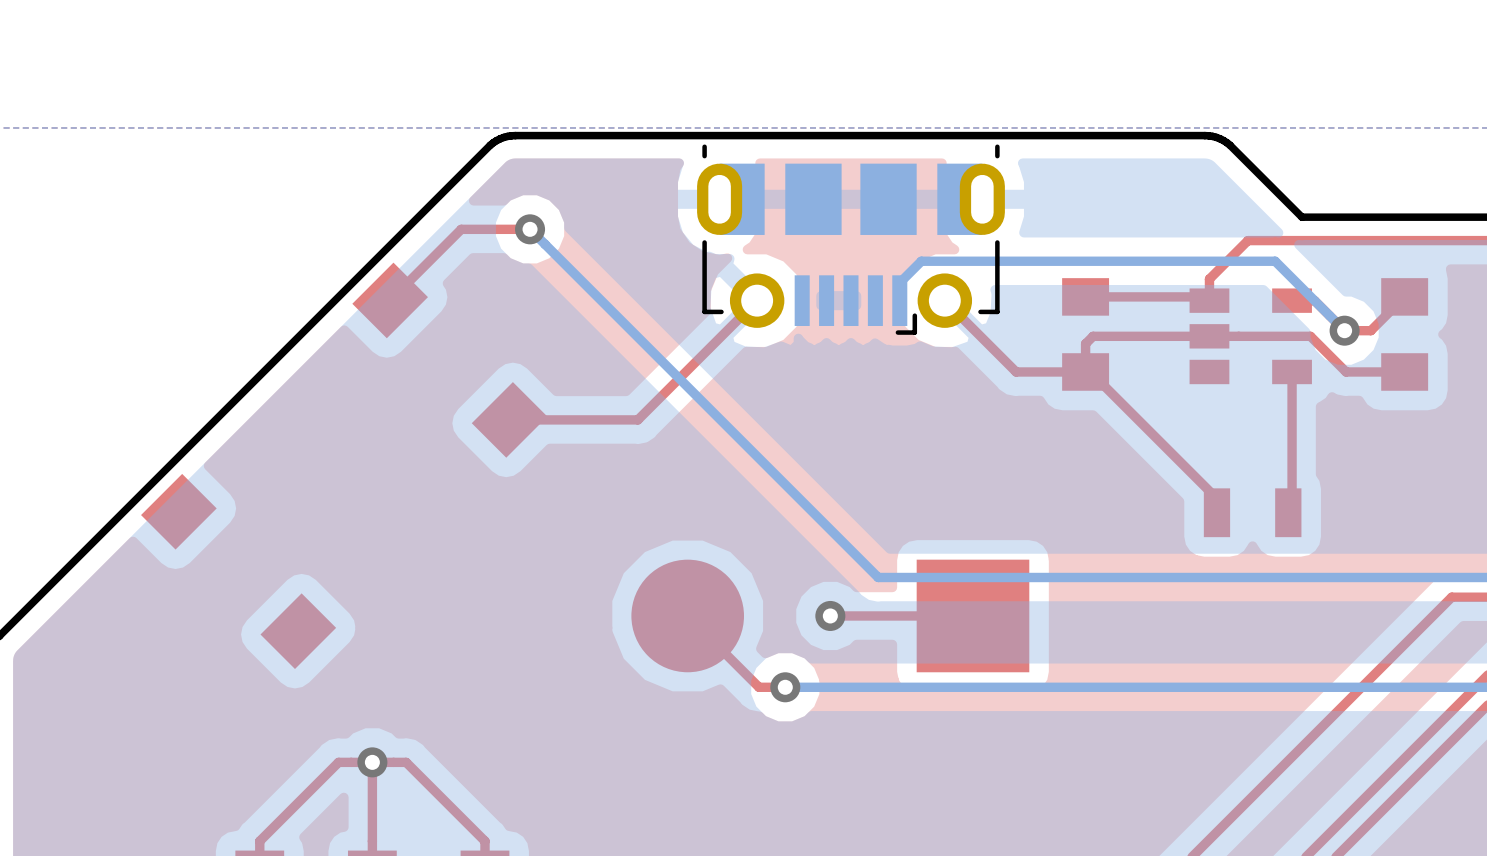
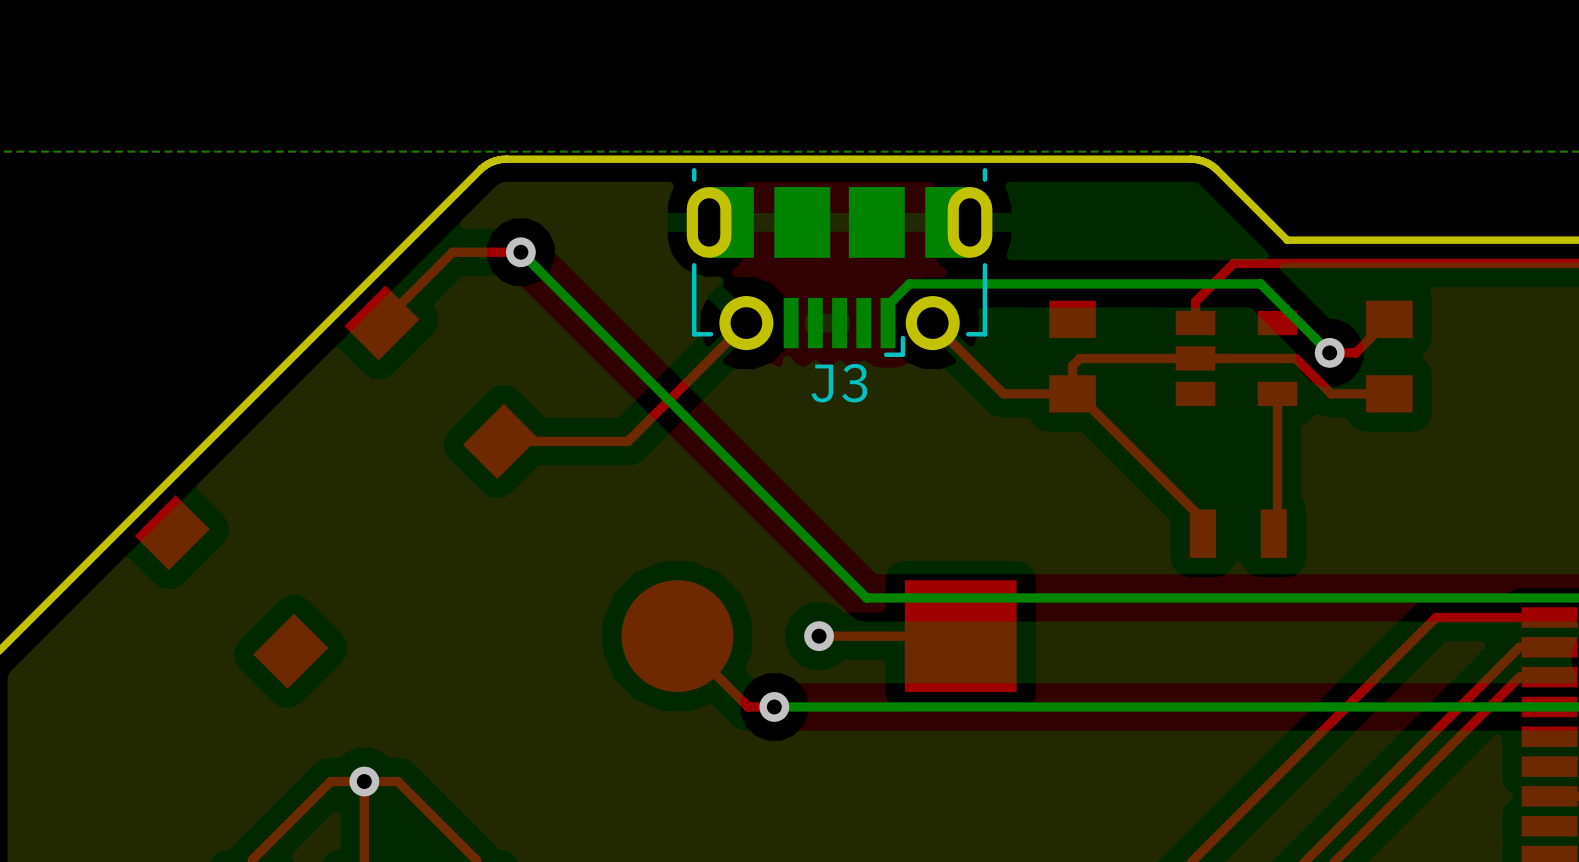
top track: (1085, 296) (1205, 296) (1209, 300) -> none
J3 name: none -> J3 (839, 383)

